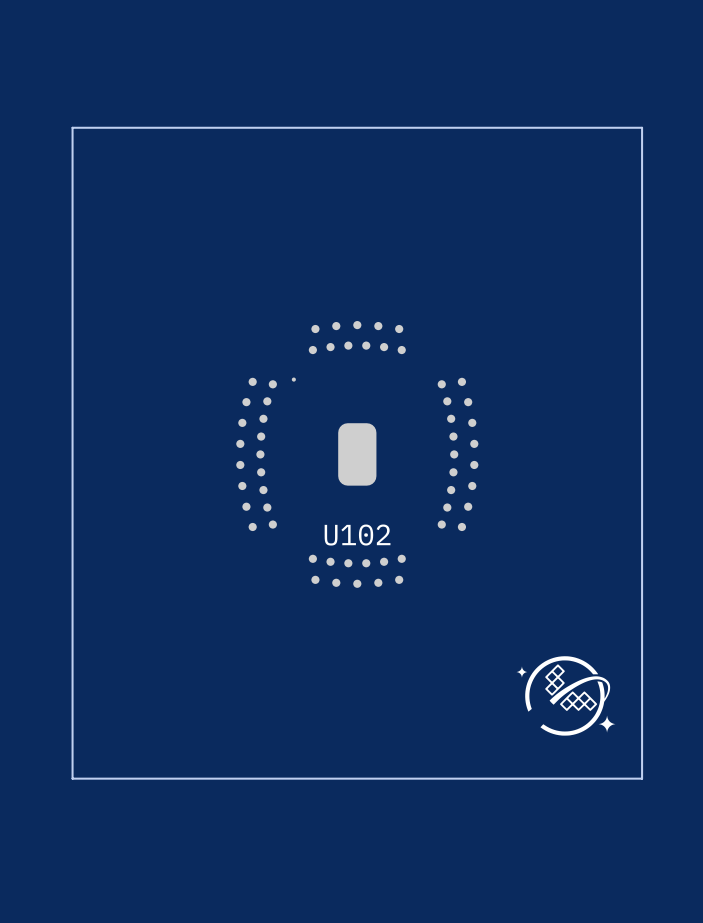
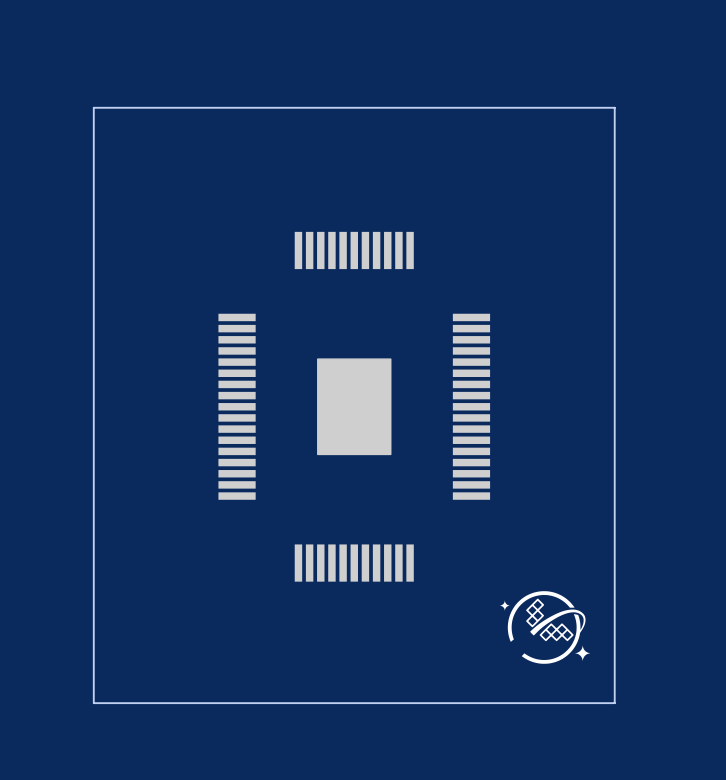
U102: (357, 454) -> none
part: none -> (354, 406)

